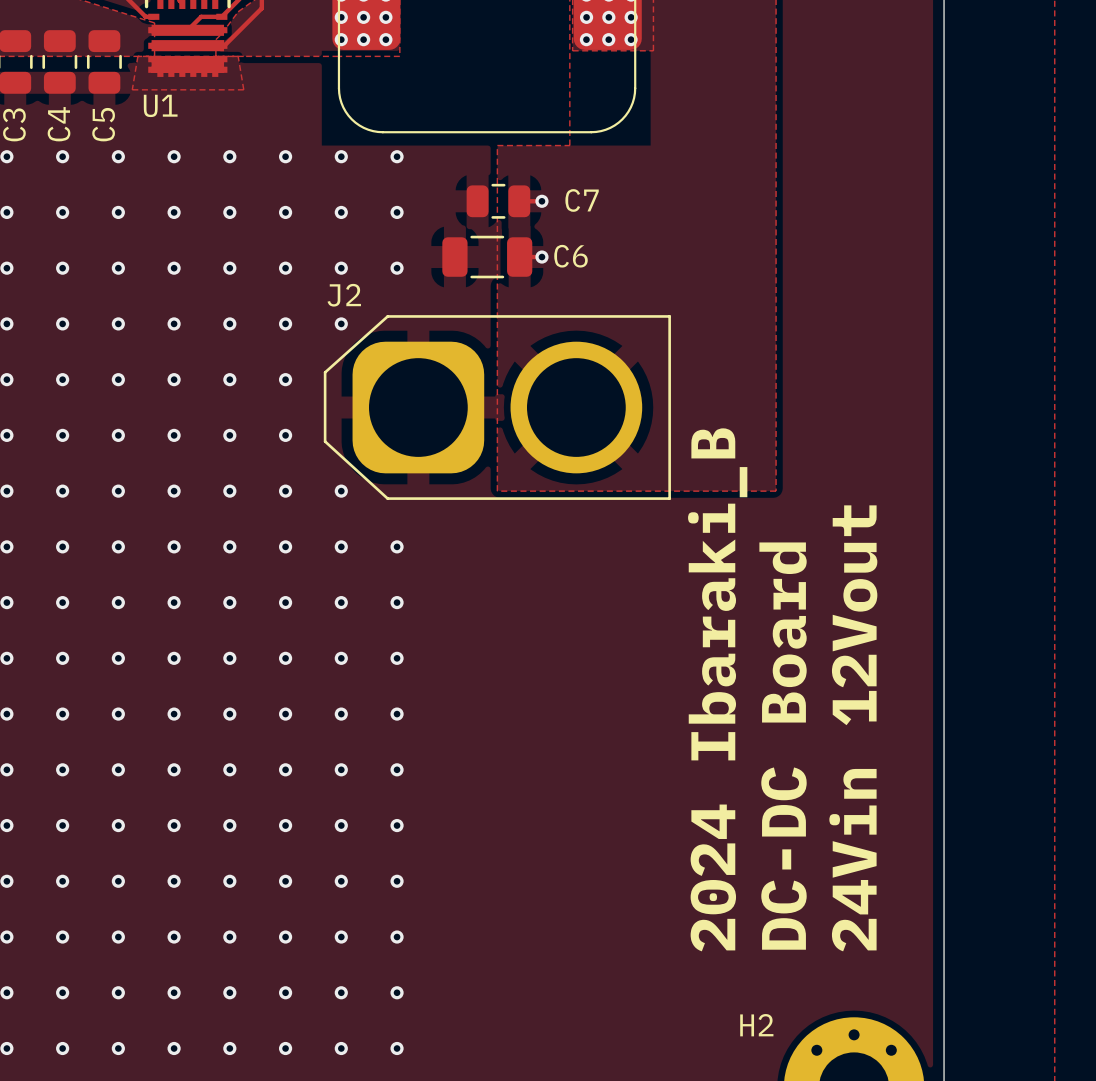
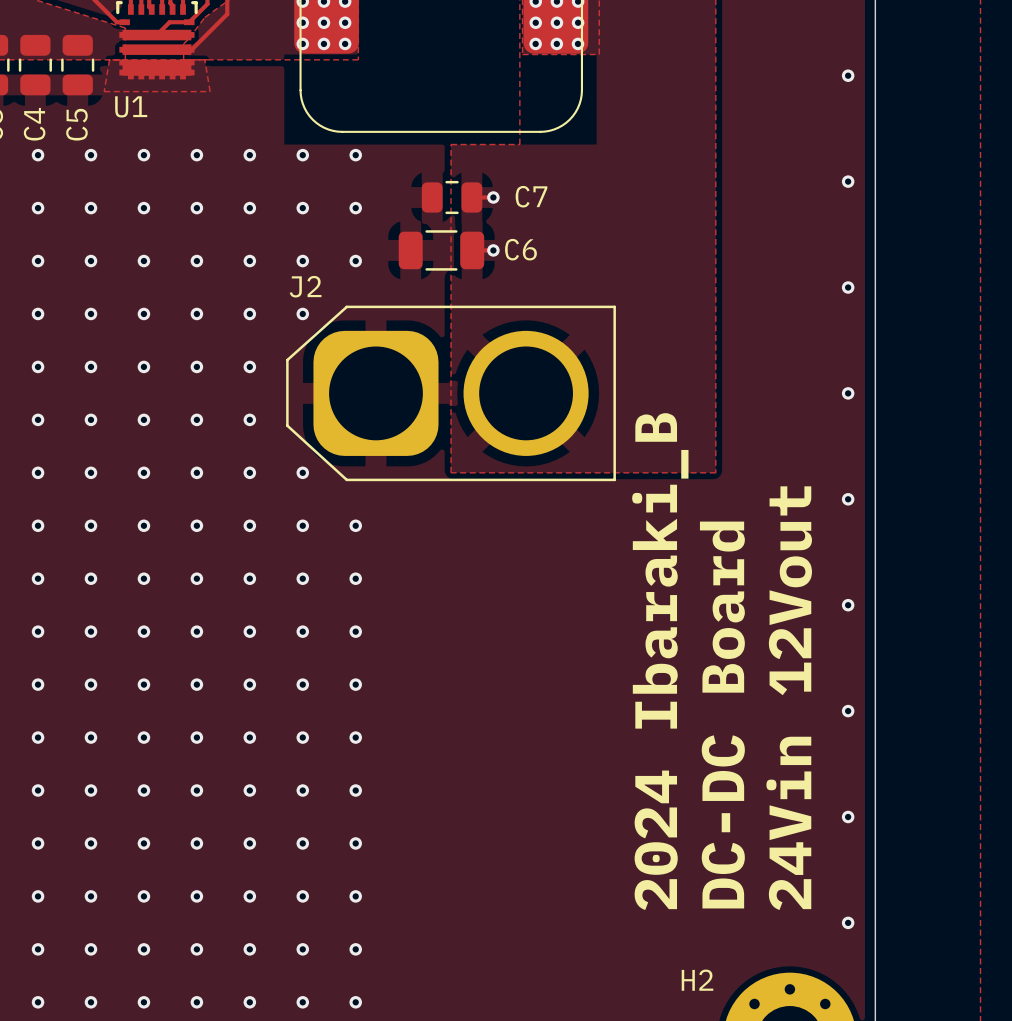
via: none -> (848, 75)
via: none -> (848, 181)
via: none -> (848, 287)
via: none -> (848, 393)
via: none -> (848, 499)
via: none -> (848, 605)
via: none -> (848, 711)
via: none -> (848, 816)
via: none -> (848, 922)

